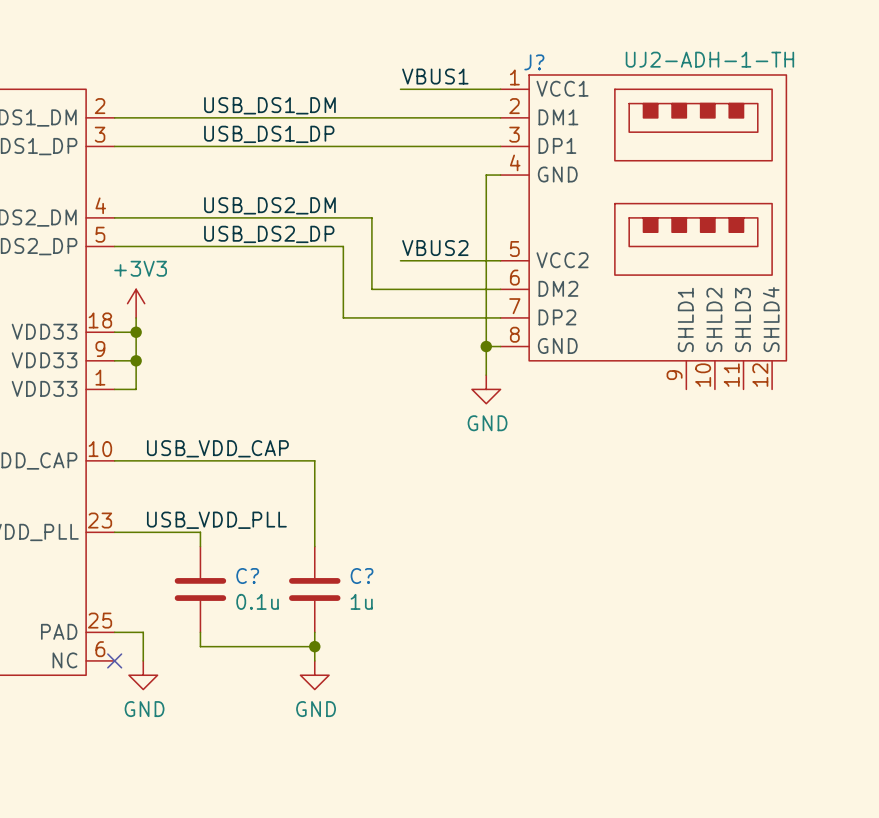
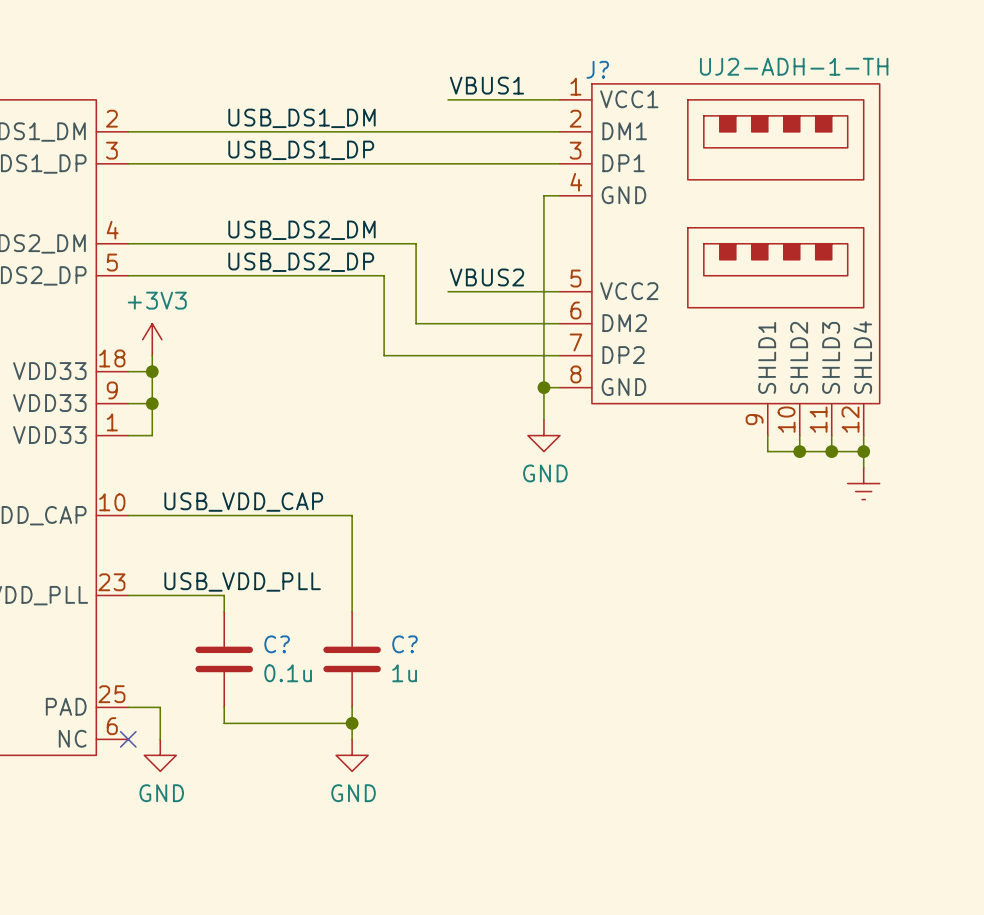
wire: none -> (767, 435) (767, 451) (863, 451)
wire: none -> (799, 435) (799, 451)
wire: none -> (831, 435) (831, 451)
wire: none -> (863, 435) (863, 467)
junction: none -> (799, 451)
junction: none -> (831, 451)
junction: none -> (863, 451)
power symbol: none -> (863, 483)

